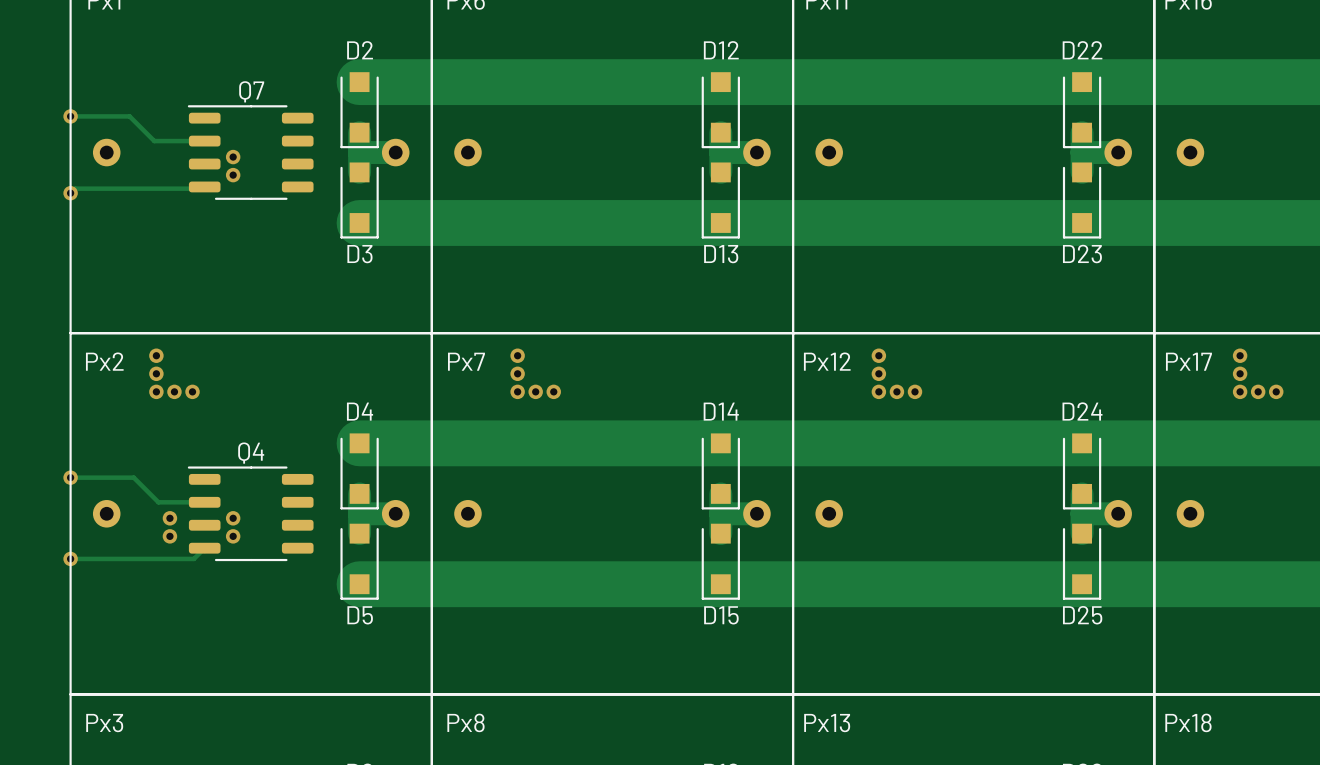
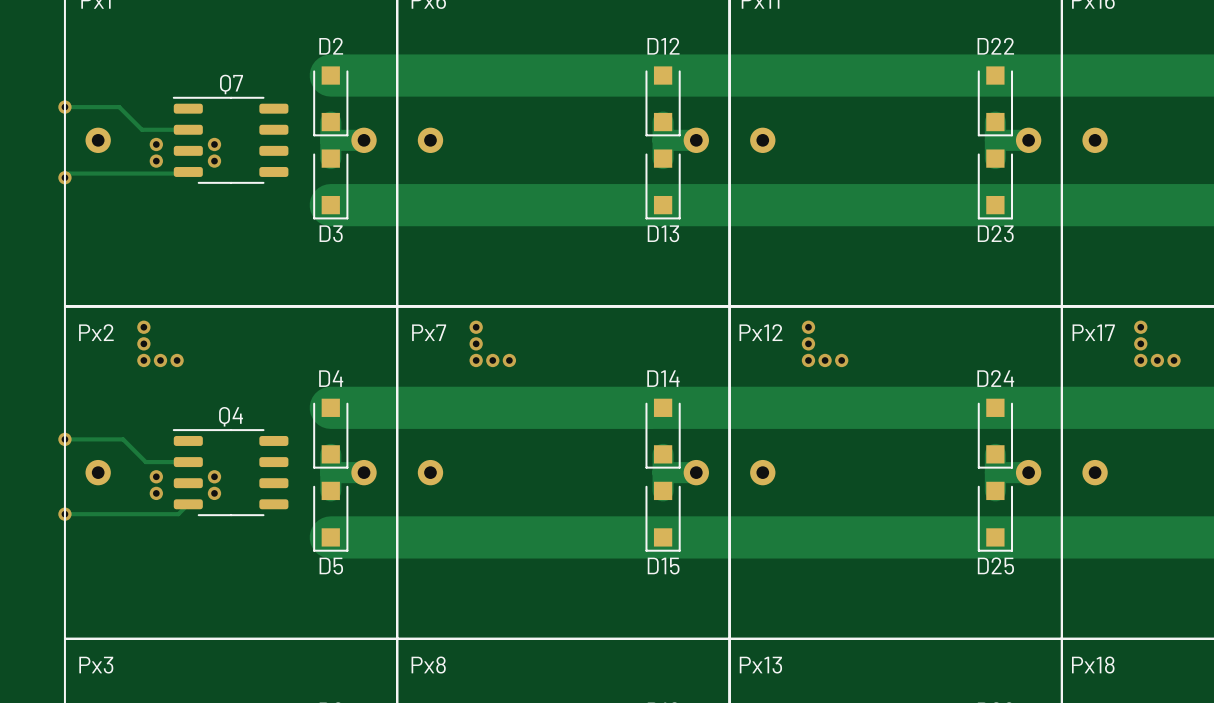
via: none -> (156, 144)
via: none -> (156, 161)

